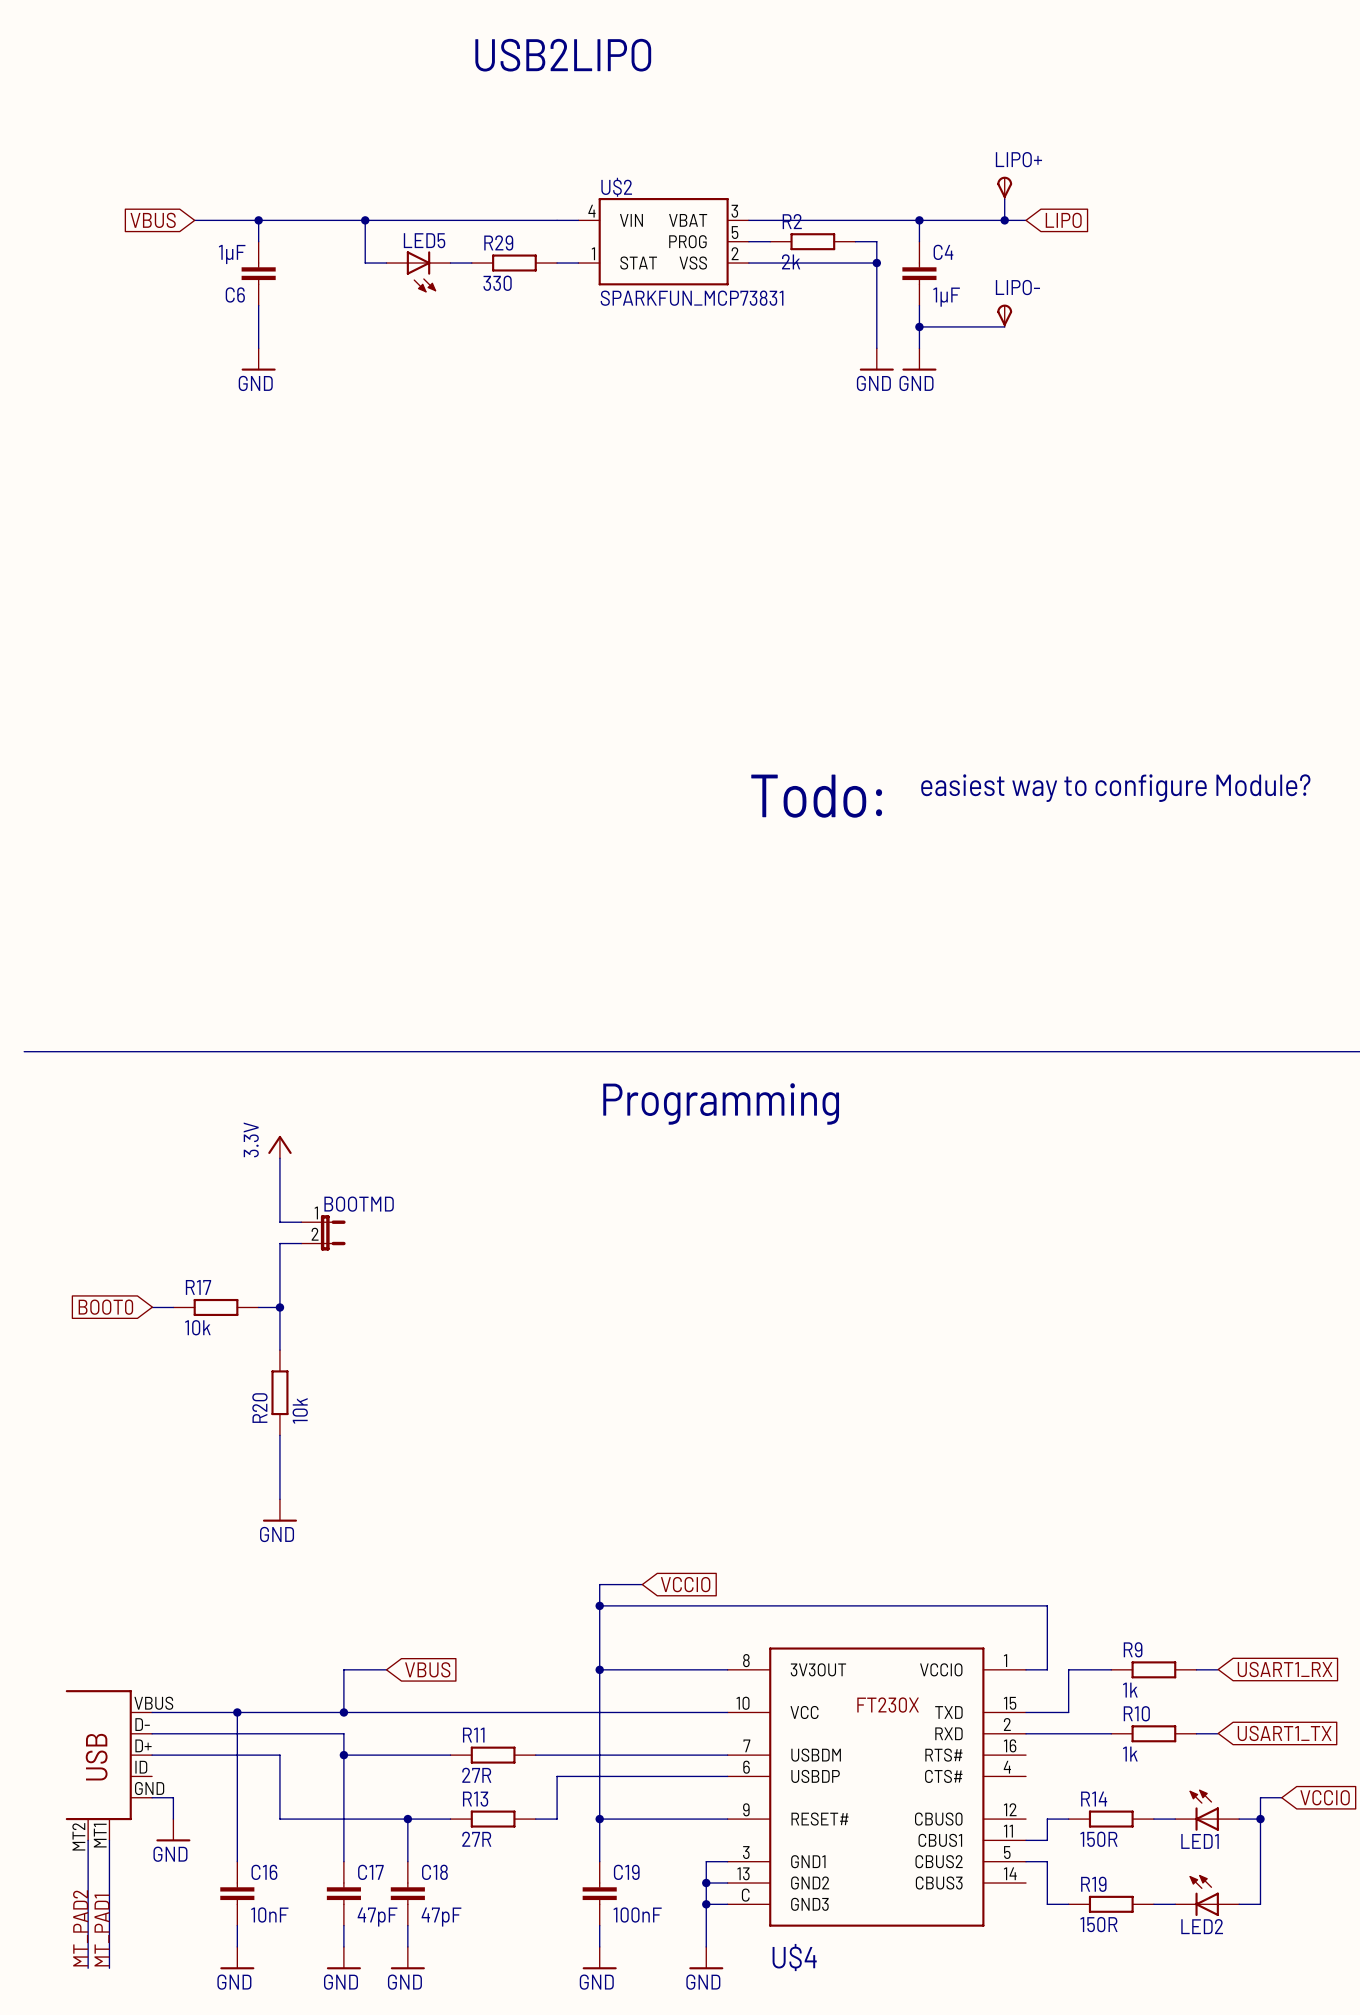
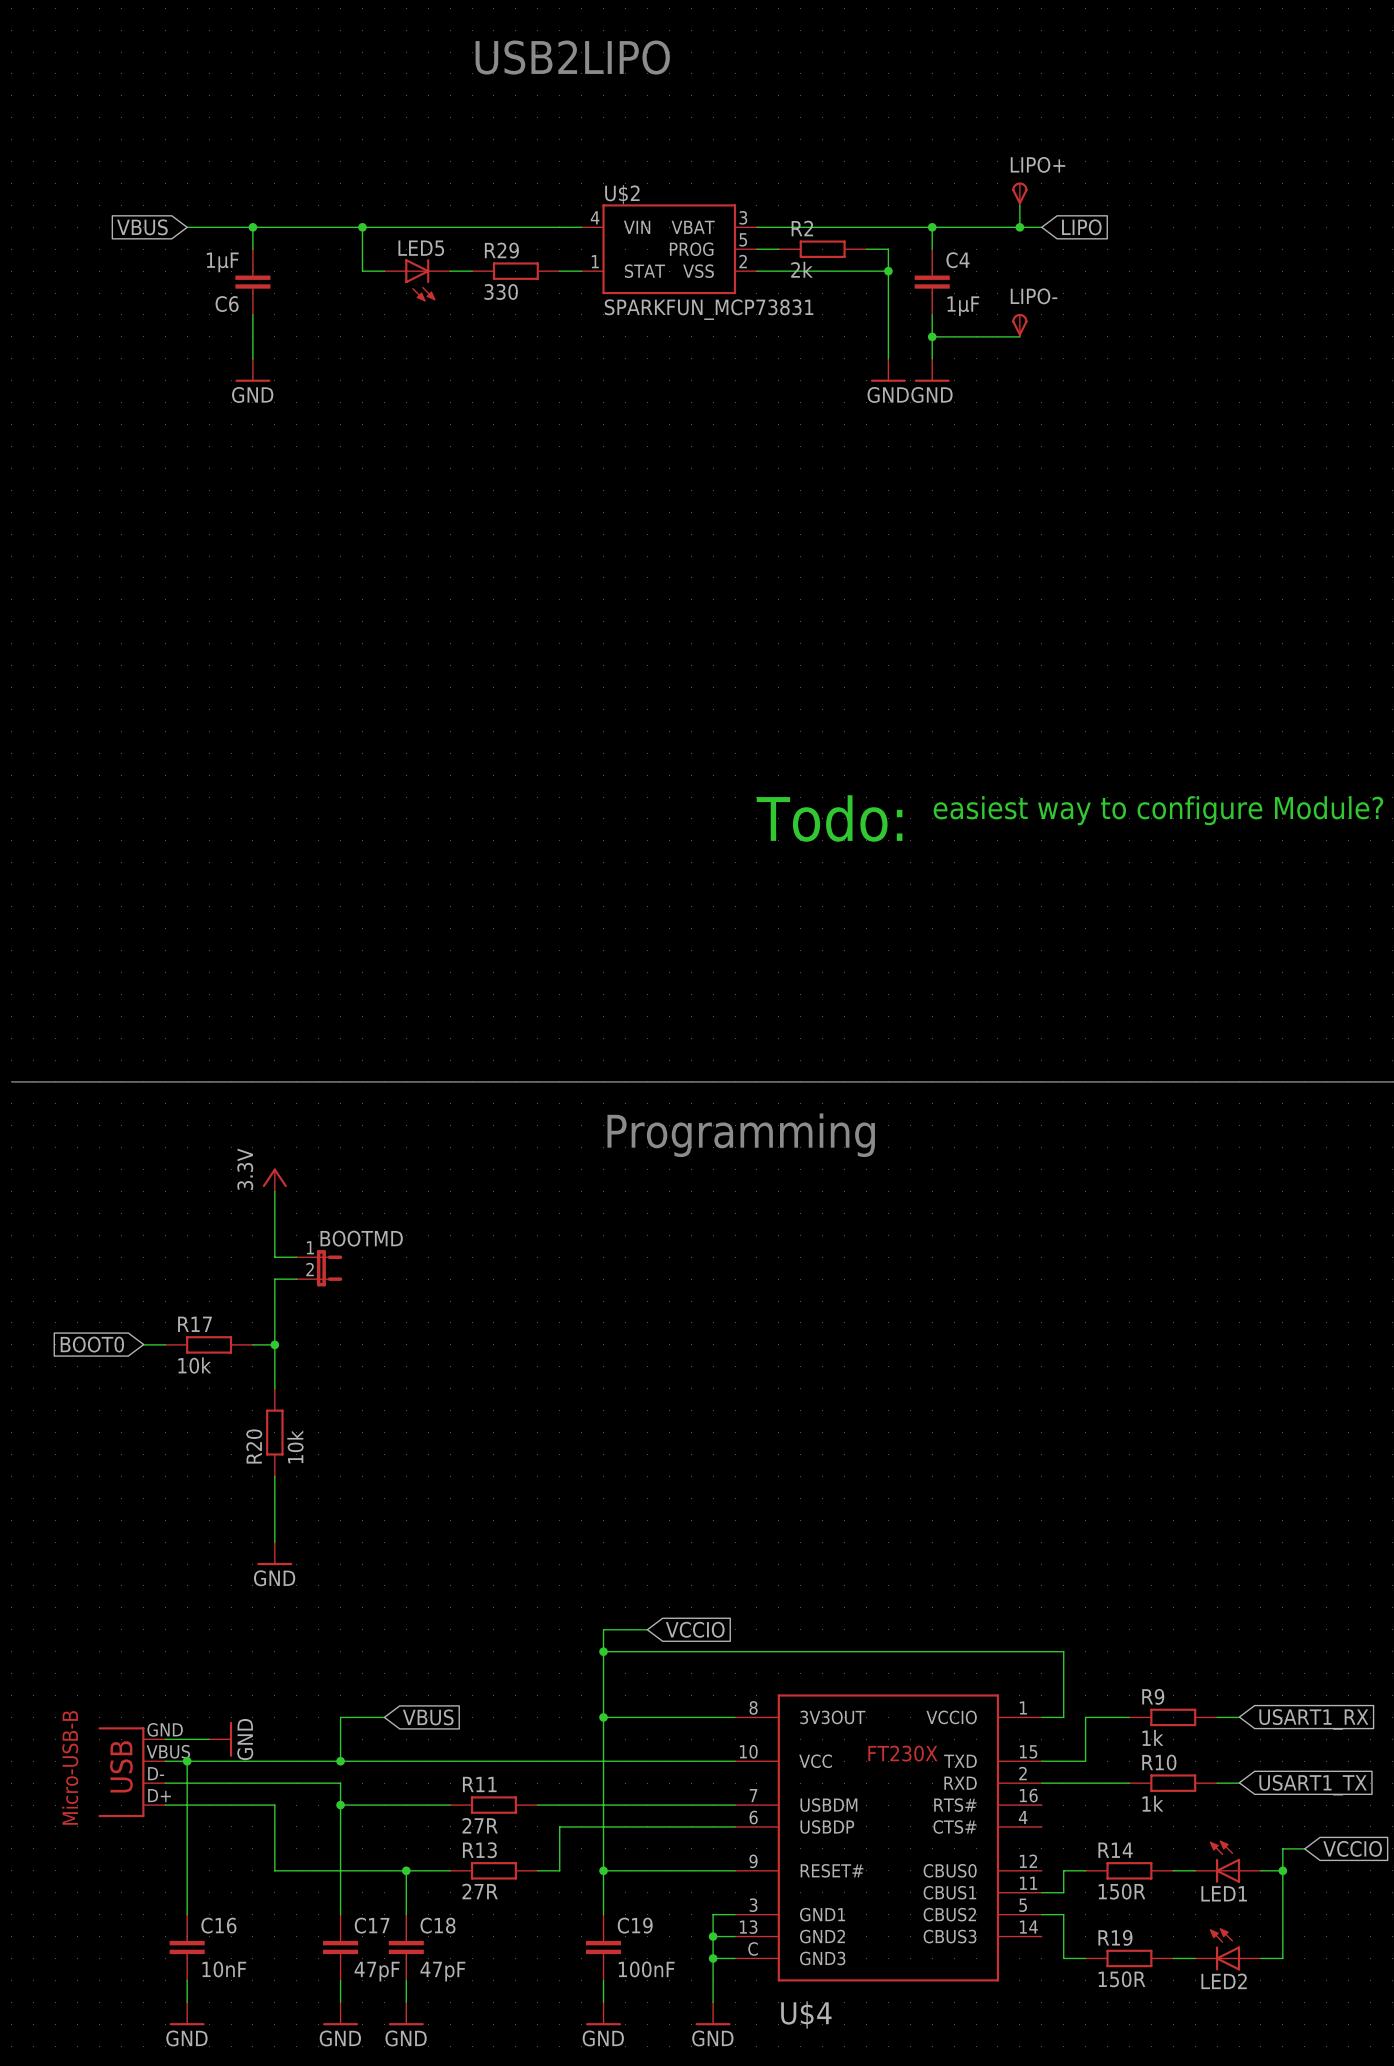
wire: none -> (165, 1739) (209, 1739)
power symbol: none -> GND (220, 1739)
wire: (237, 1712) (237, 1861) -> (187, 1761) (187, 1914)
junction position: (237, 1712) -> (187, 1761)
text: none -> Micro-USB-B (70, 1767)
part: none -> (131, 1772)
part: (108, 1765) -> none
wire: (152, 1797) (173, 1797) (173, 1819) -> none
power symbol: GND (173, 1830) -> none
wire: (88, 1840) (88, 1968) -> none
wire: (109, 1840) (109, 1968) -> none
C16 position: (237, 1893) -> (187, 1947)
wire: (237, 1925) (237, 1946) -> (187, 1980) (187, 2002)
label: MT_PAD2 (80, 1928) -> none
label: MT_PAD1 (101, 1930) -> none
power symbol position: GND (237, 1958) -> GND (187, 2013)

